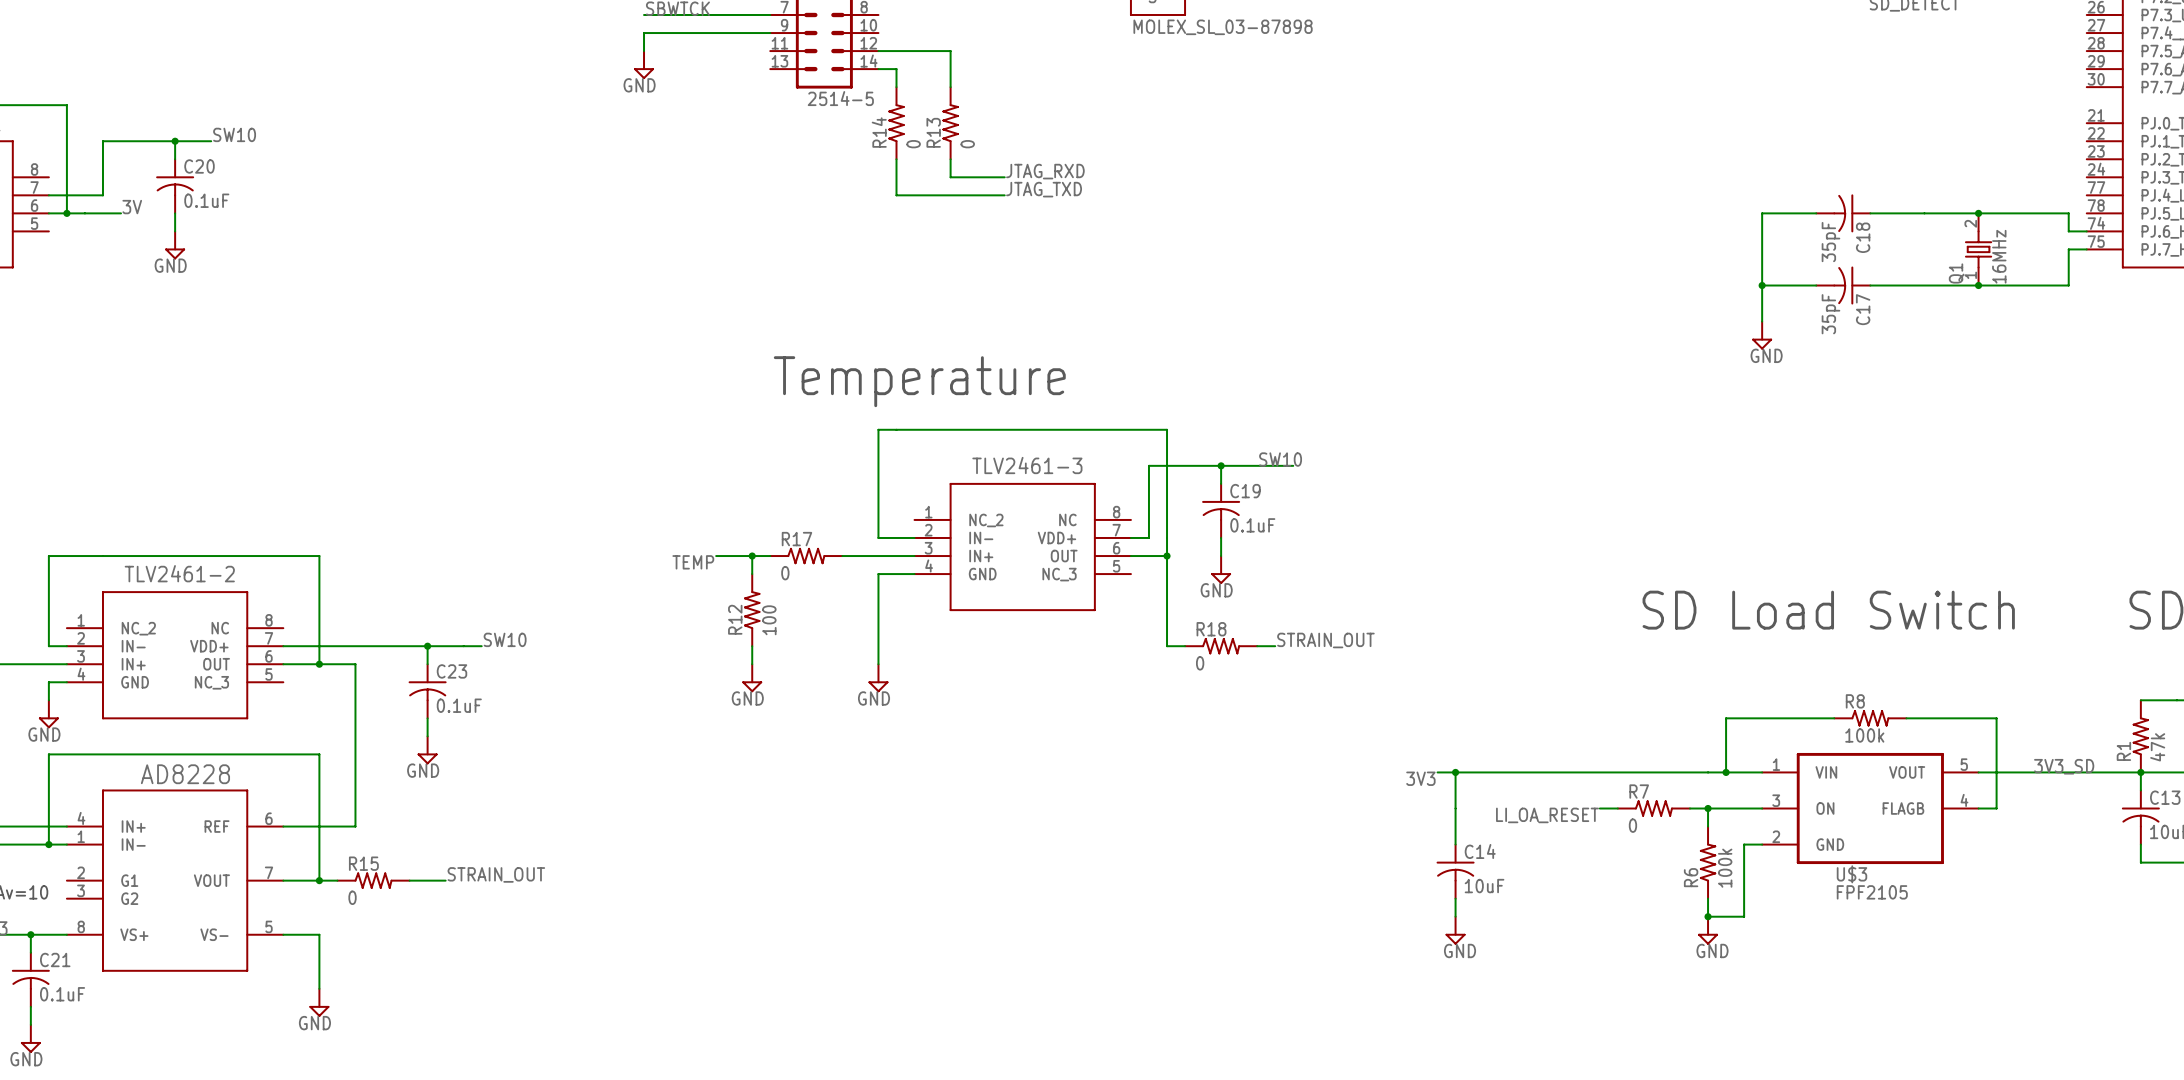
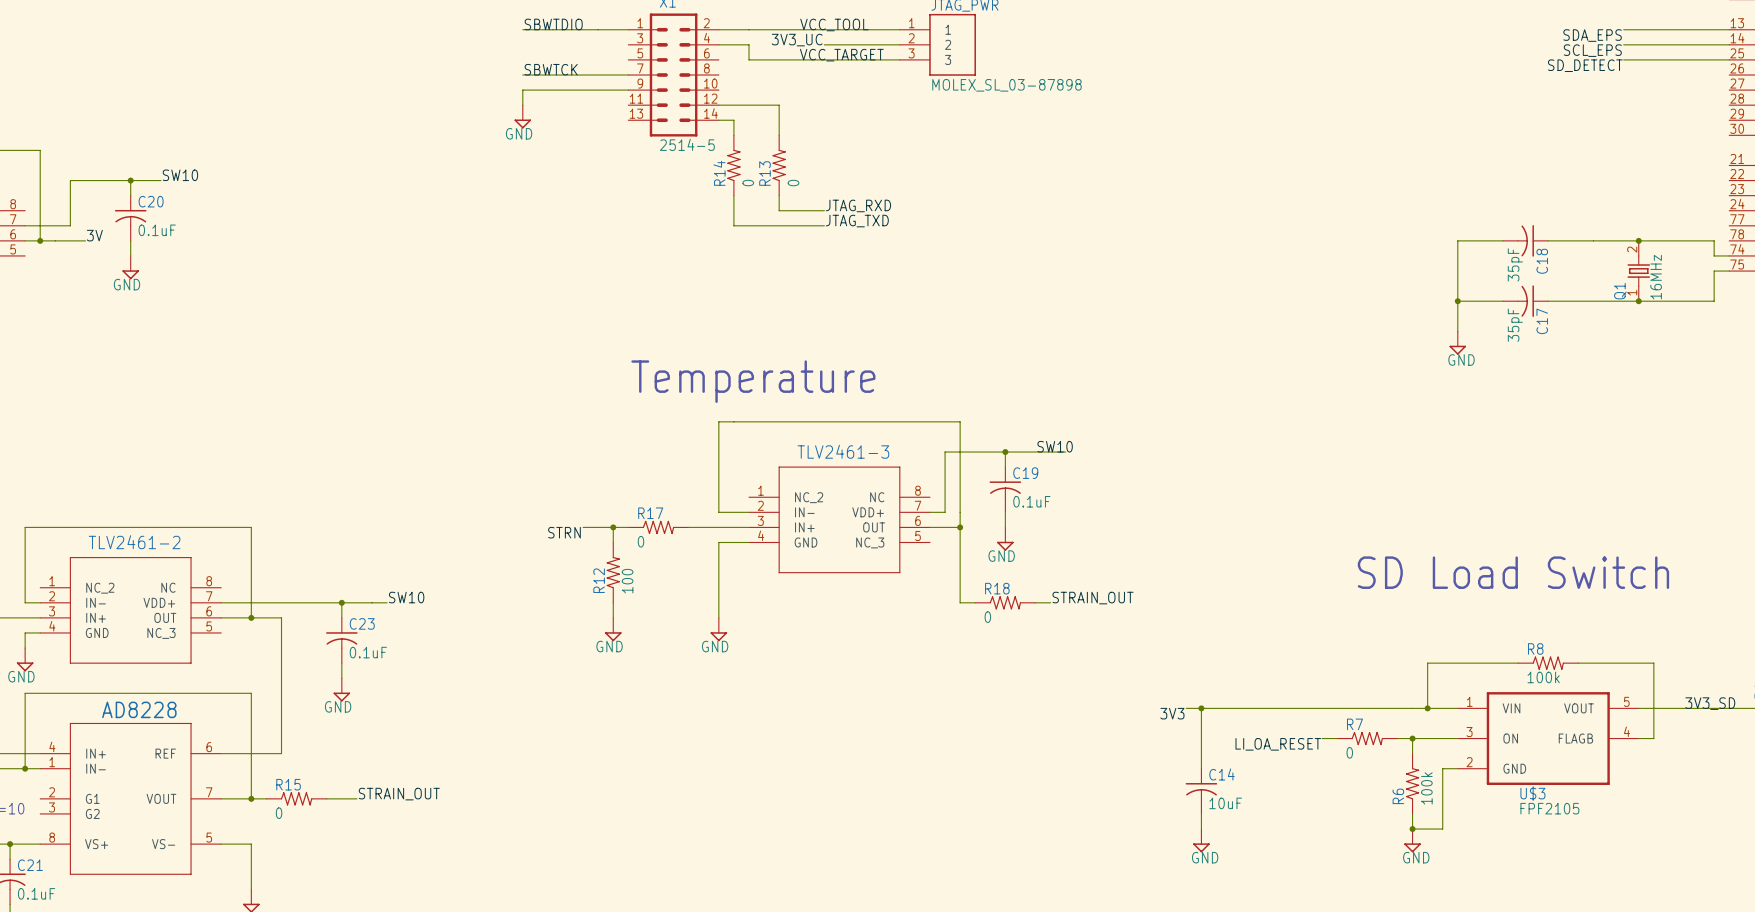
label: TEMP (693, 562) -> STRN (564, 532)

